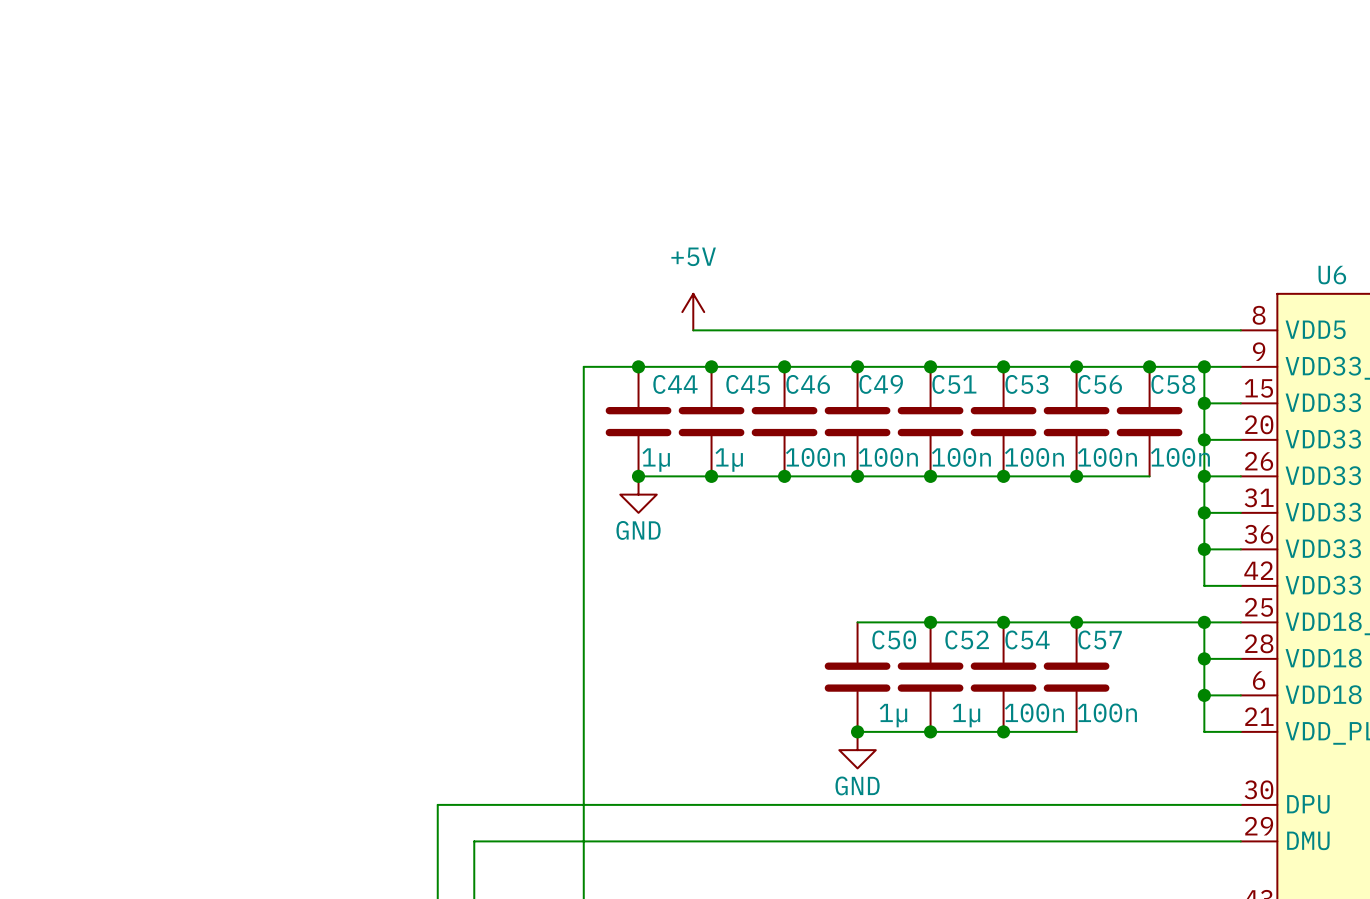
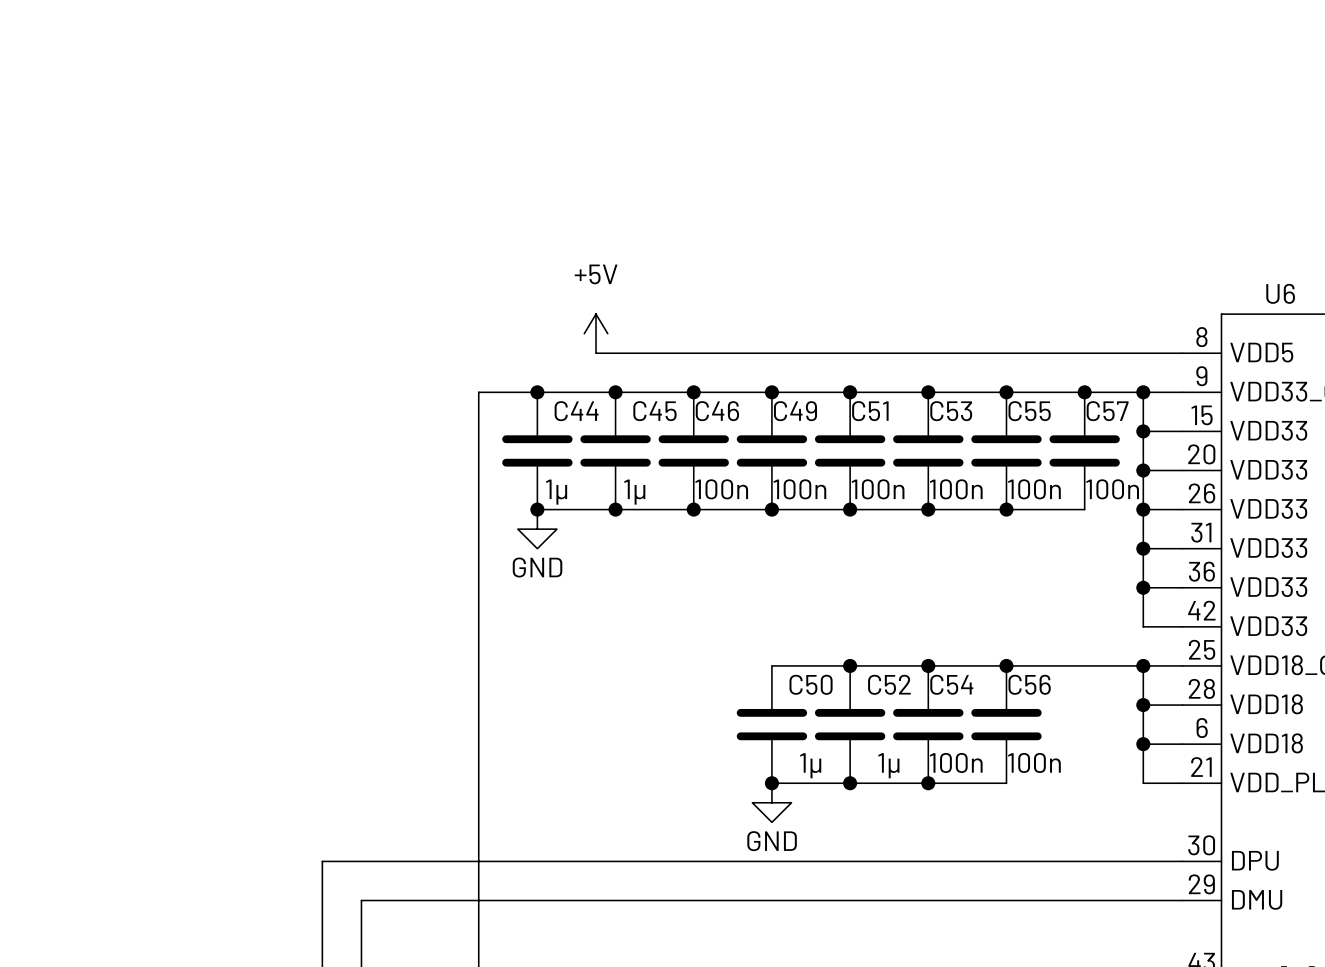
C56 name: C56 (1100, 384) -> C55 (1029, 411)
C58 name: C58 (1173, 384) -> C57 (1107, 411)
C57 name: C57 (1100, 639) -> C56 (1029, 684)

